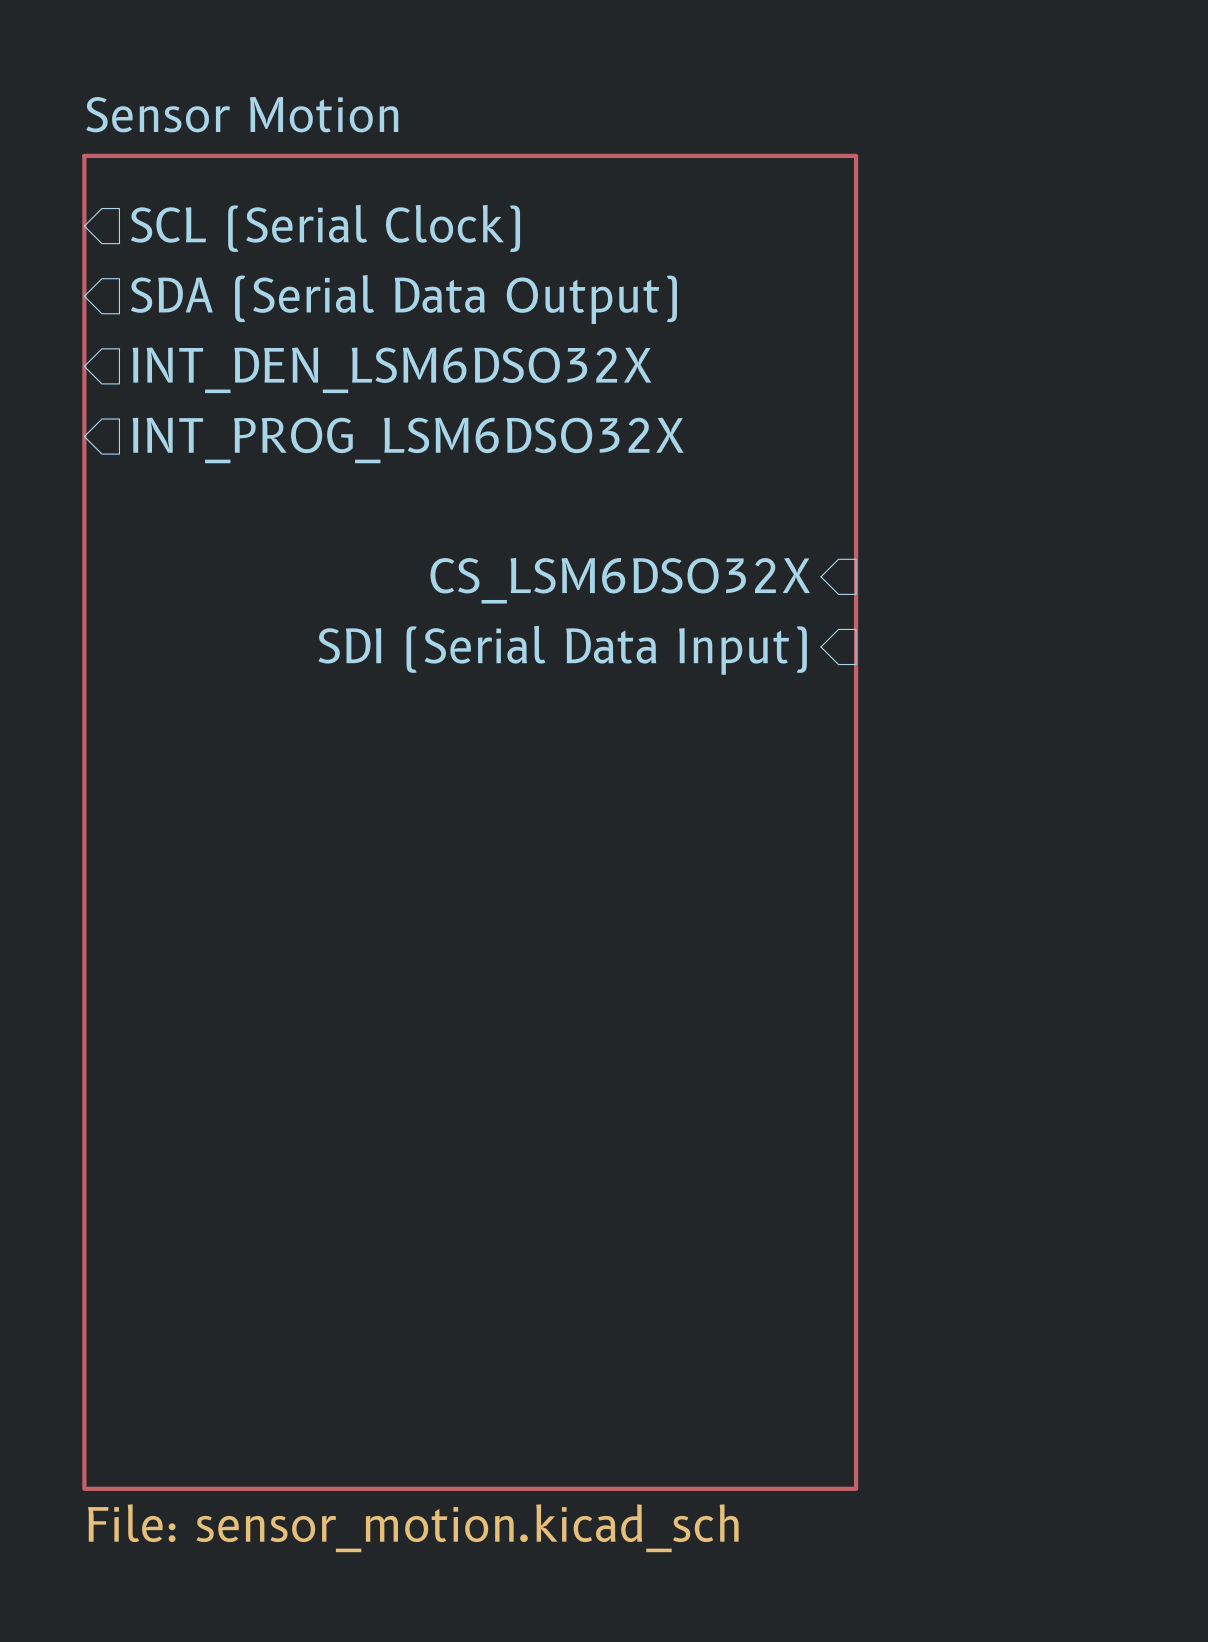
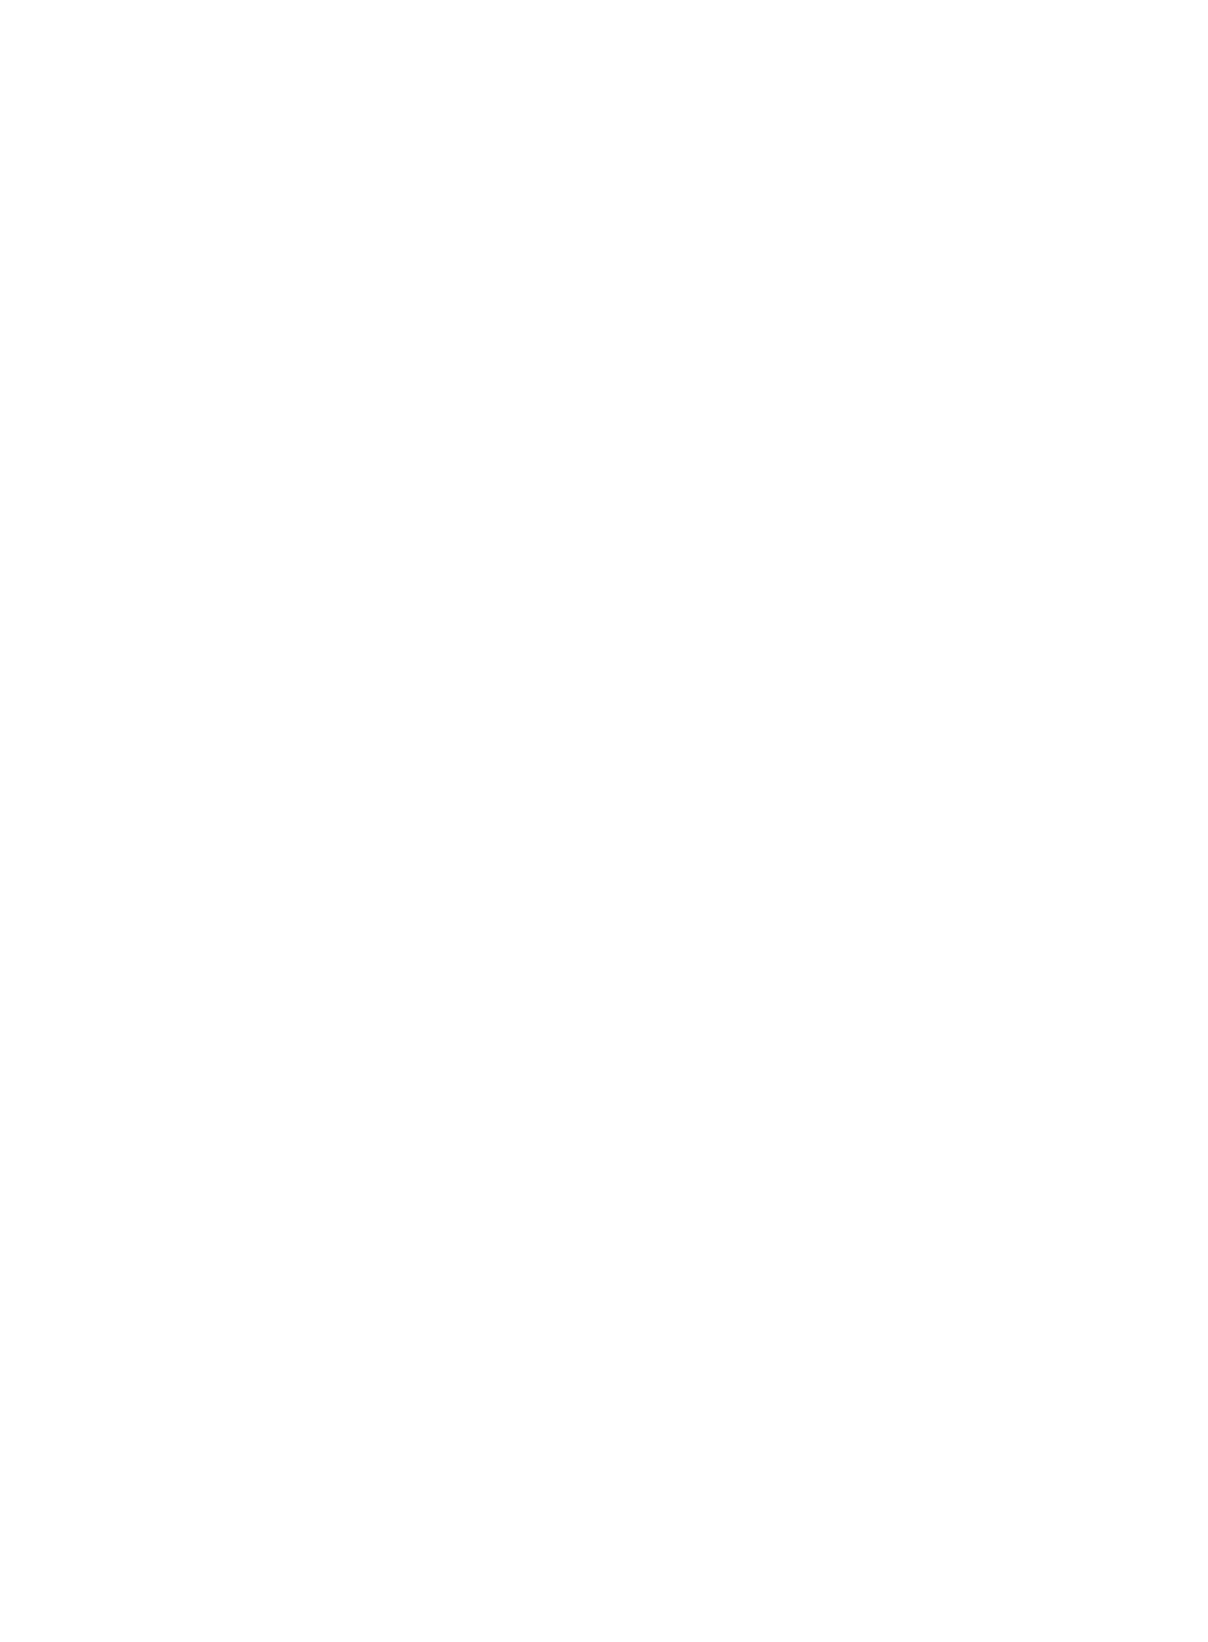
sheet pin: SCL (Serial Clock) (325, 228) -> none
sheet pin: SDA (Serial Data Output) (403, 299) -> none
sheet pin: INT_DEN_LSM6DSO32X (391, 370) -> none
sheet pin: INT_PROG_LSM6DSO32X (408, 440) -> none
sheet pin: CS_LSM6DSO32X (620, 580) -> none
sheet pin: SDI (Serial Data Input) (562, 650) -> none
sheet Sensor Motion: File: sensor_motion.kicad_sch (470, 822) -> none

